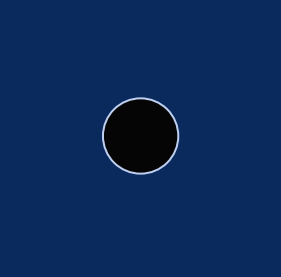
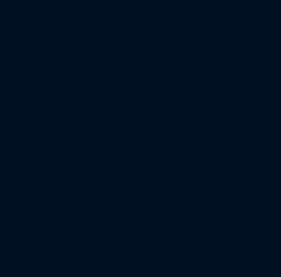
part: (140, 135) -> none

